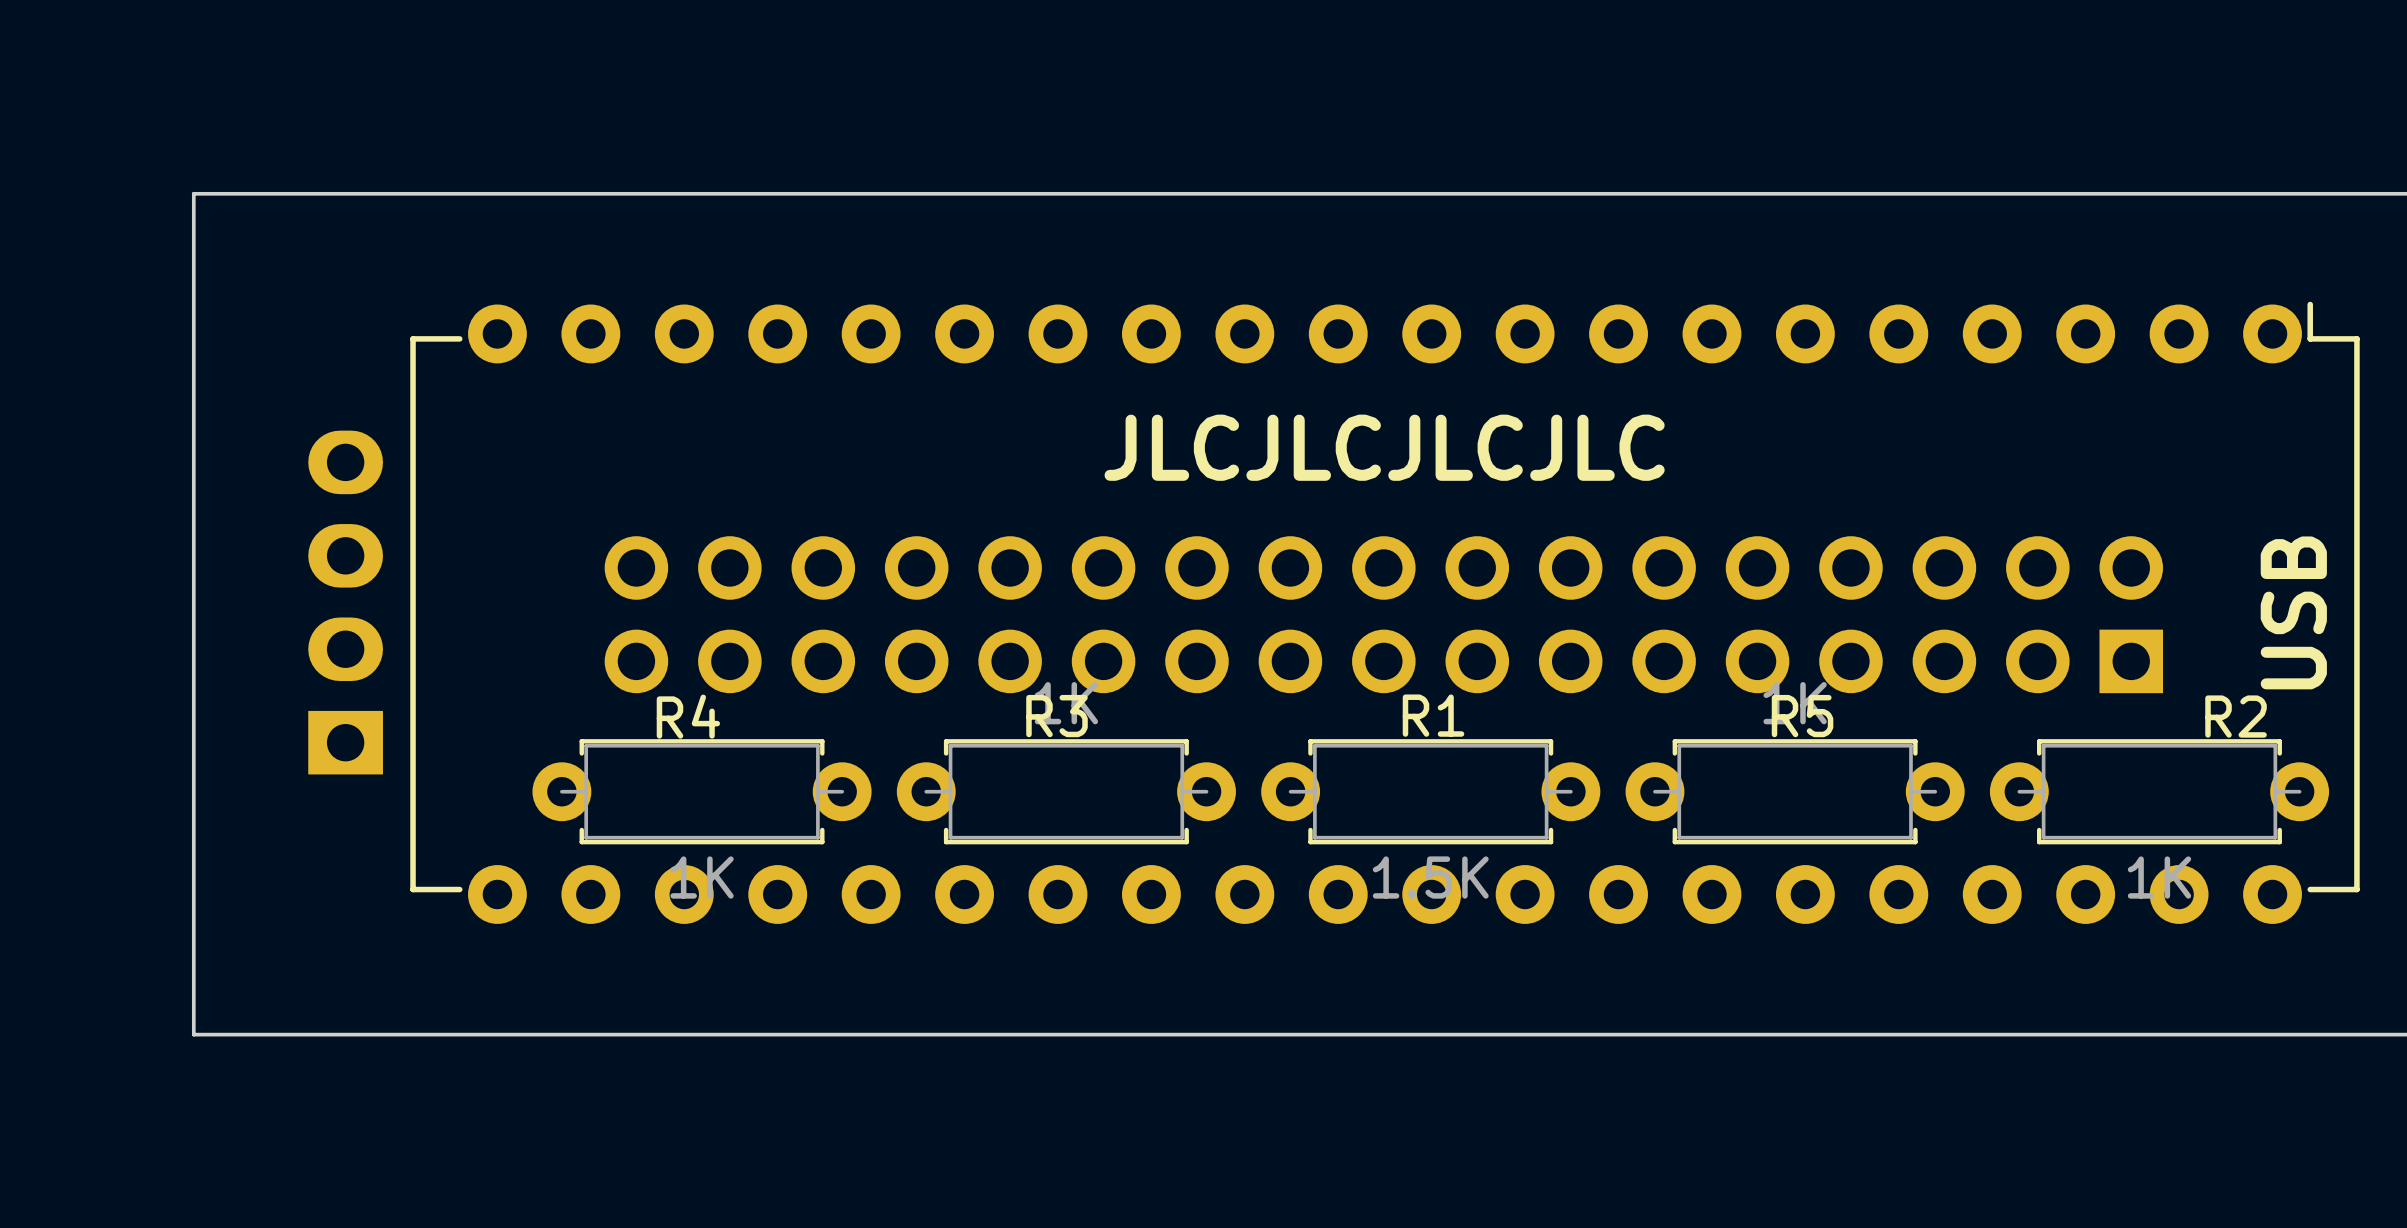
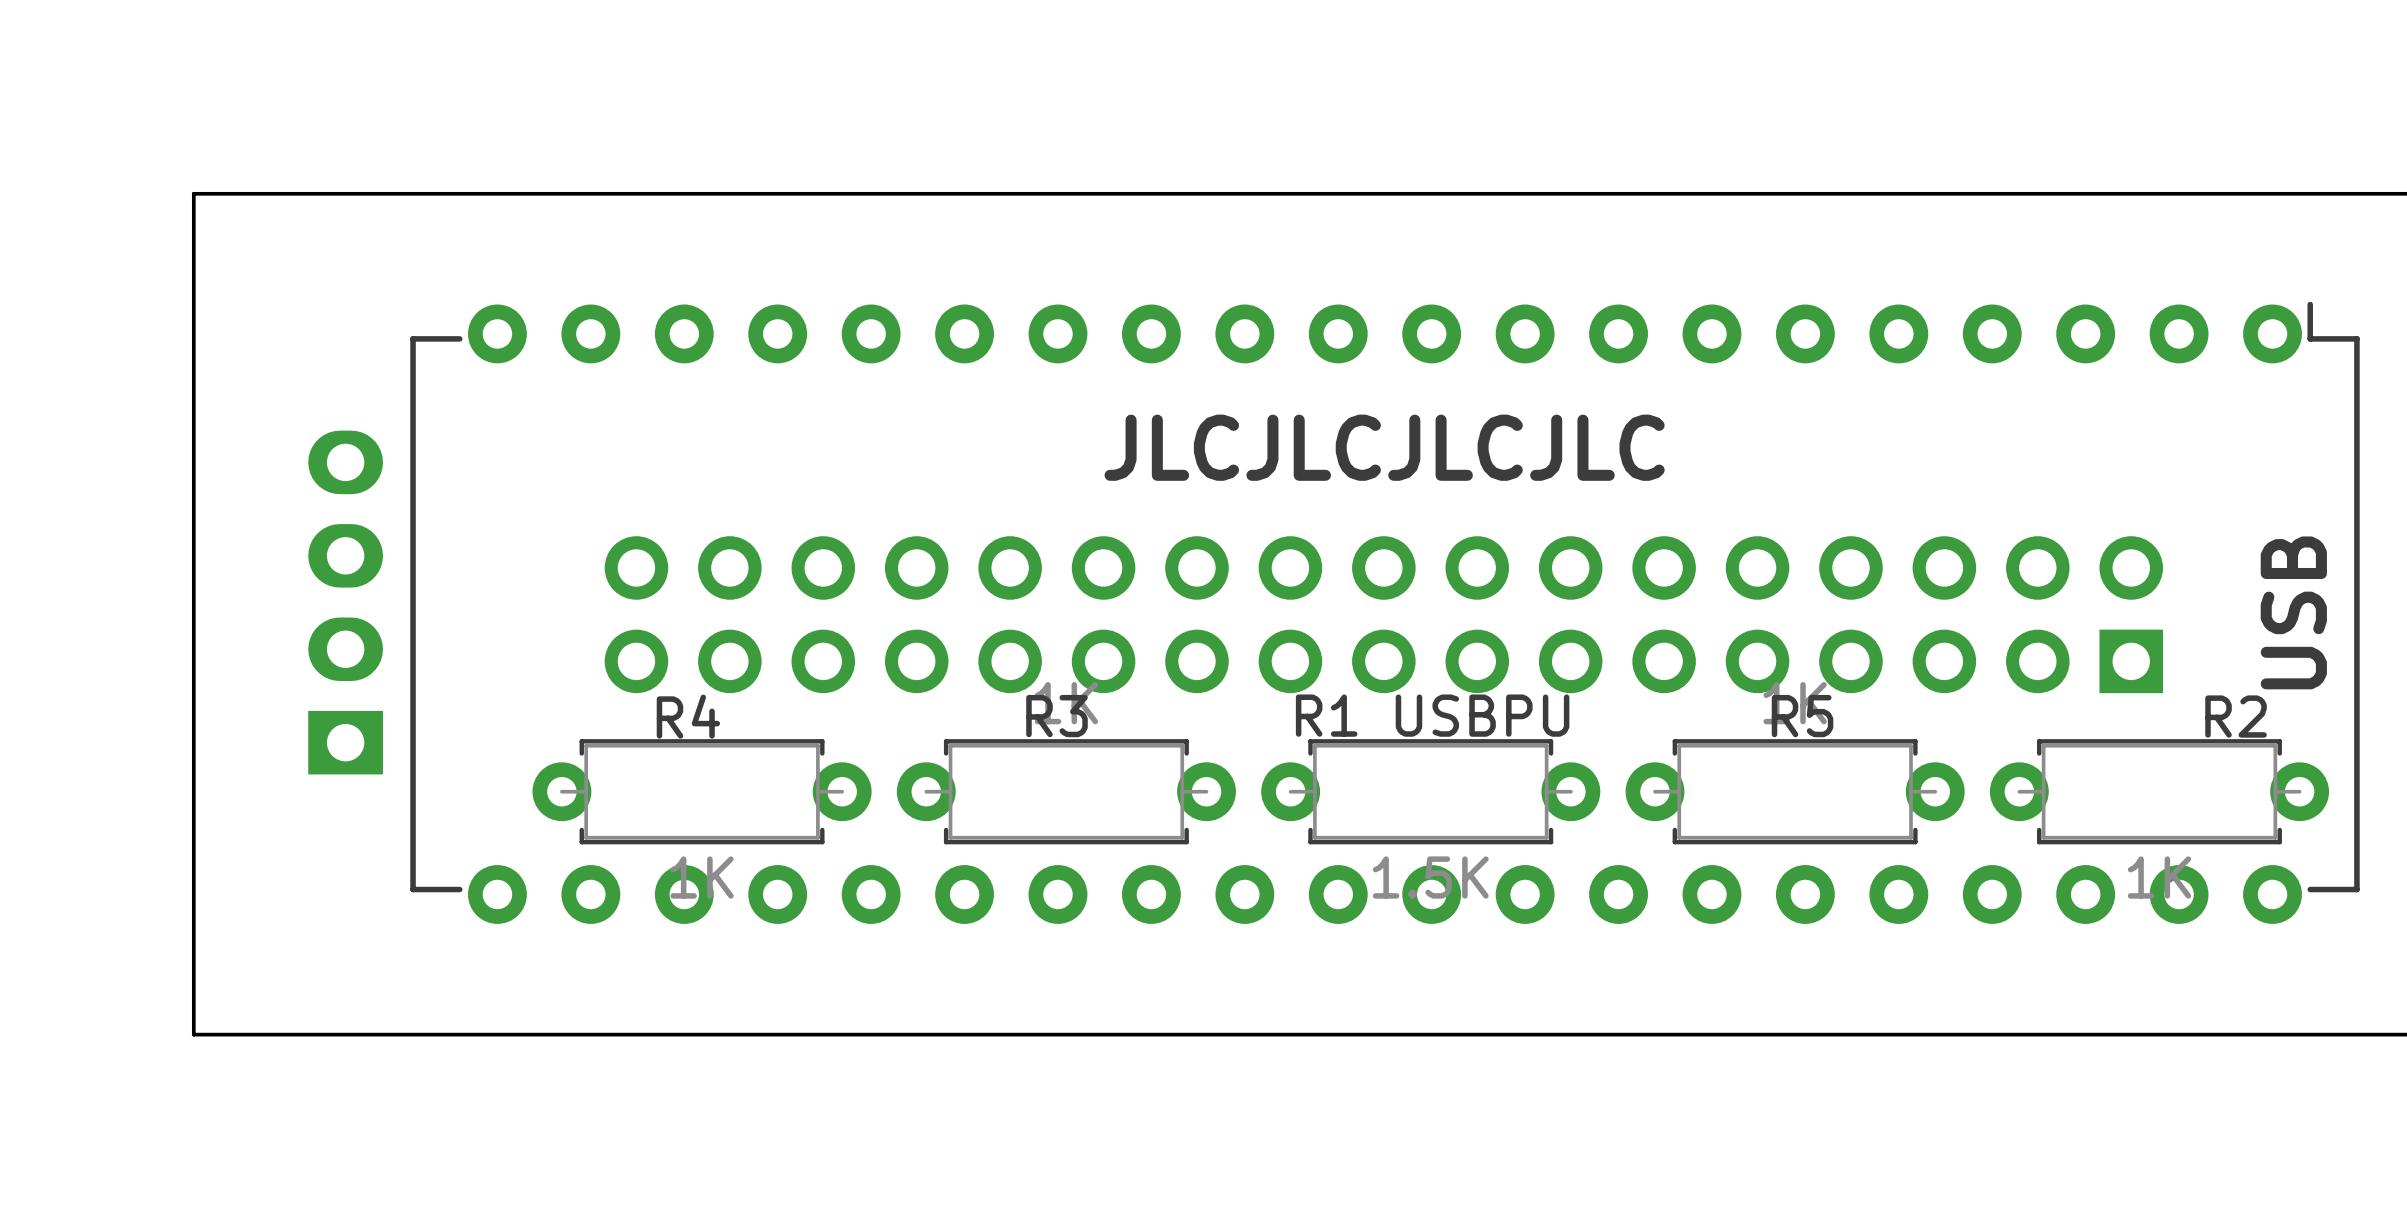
R1 name: R1 (1433, 715) -> R1 USBPU (1432, 715)

